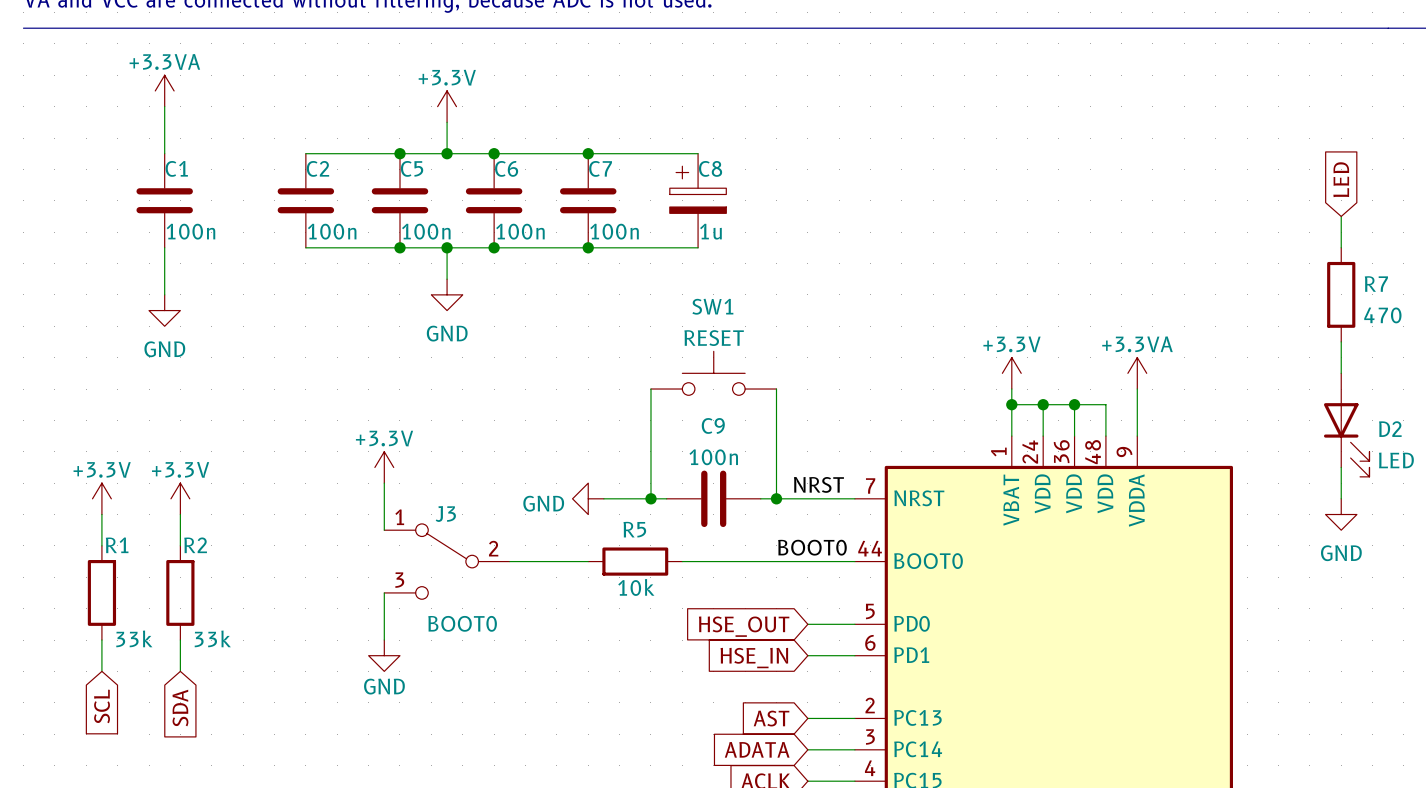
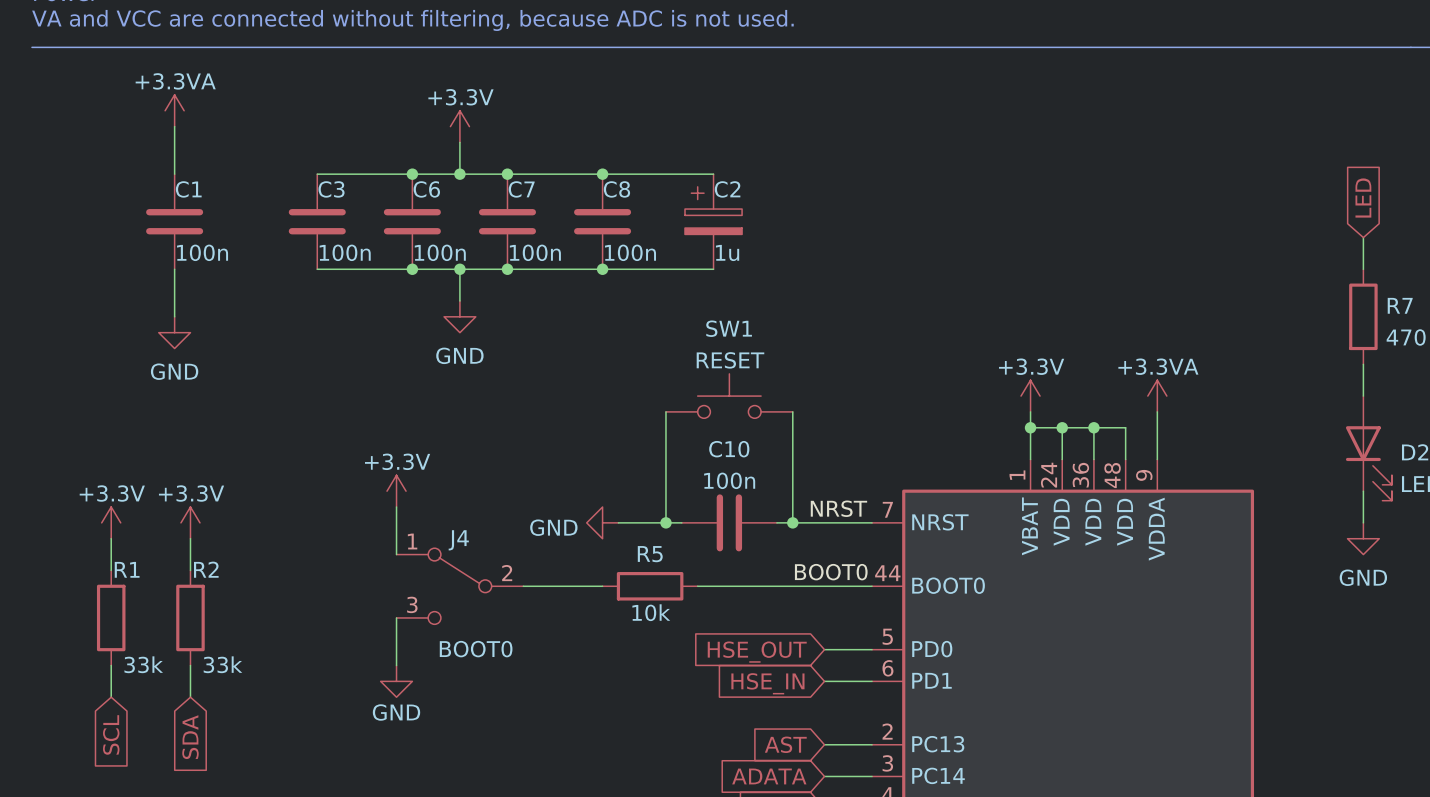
C2 name: C2 (317, 168) -> C3 (331, 189)
C5 name: C5 (412, 168) -> C6 (426, 189)
C6 name: C6 (506, 168) -> C7 (521, 189)
C7 name: C7 (600, 168) -> C8 (616, 189)
C8 name: C8 (710, 168) -> C2 (727, 189)
C9 name: C9 (713, 425) -> C10 (729, 449)
J3 name: J3 (445, 514) -> J4 (458, 540)

